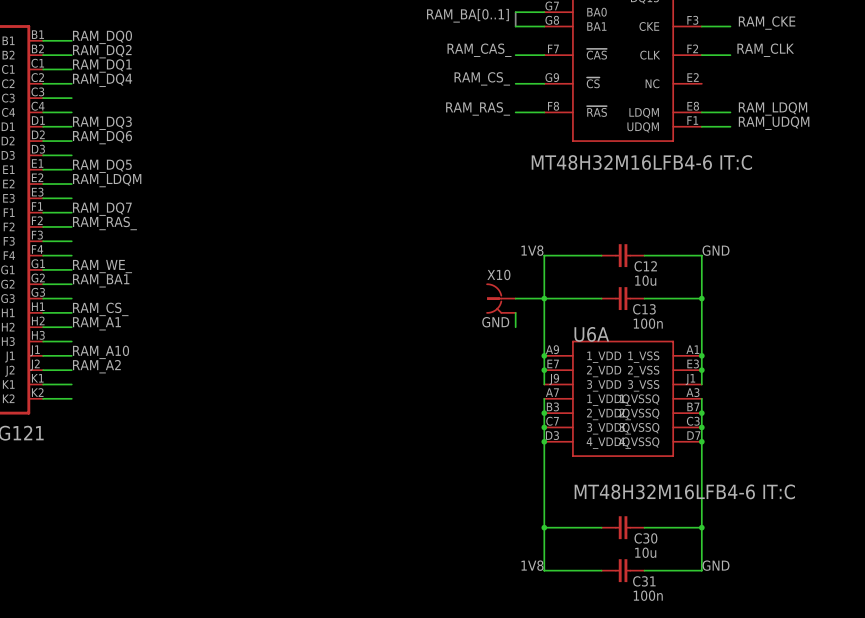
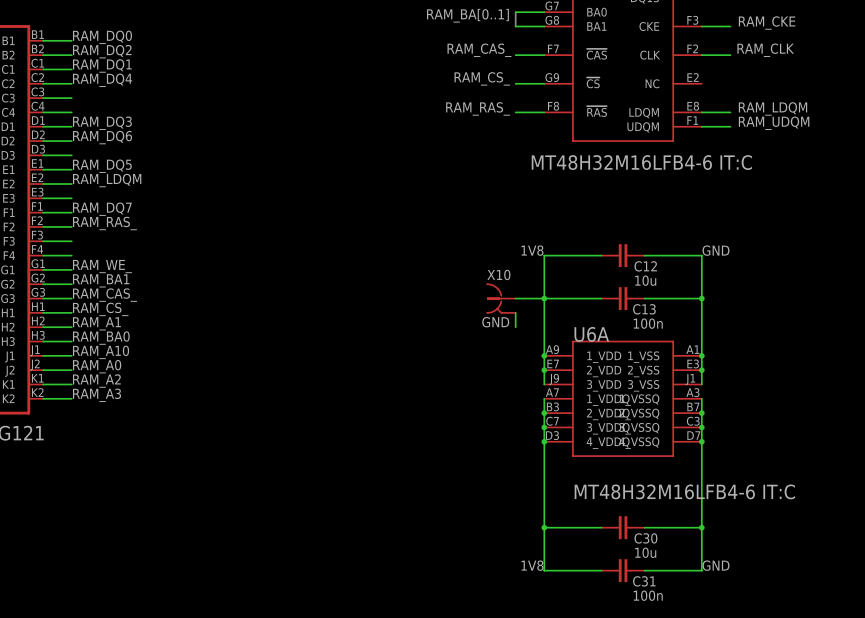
label: none -> RAM_CAS_ (104, 295)
label: none -> RAM_BA0 (101, 338)
label: RAM_A2 (96, 366) -> RAM_A0 (97, 366)
label: none -> RAM_A2 (96, 381)
label: none -> RAM_A3 (97, 395)

